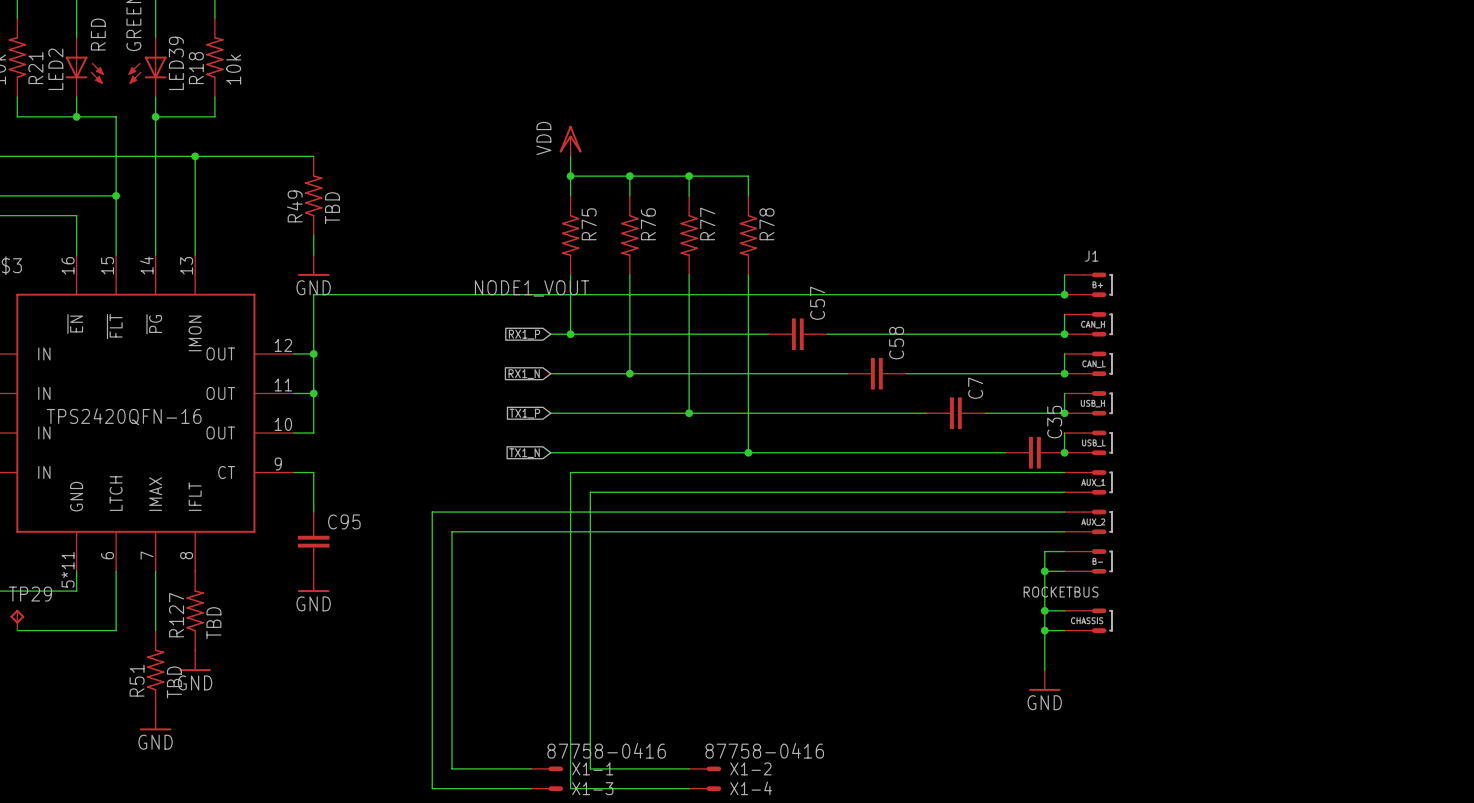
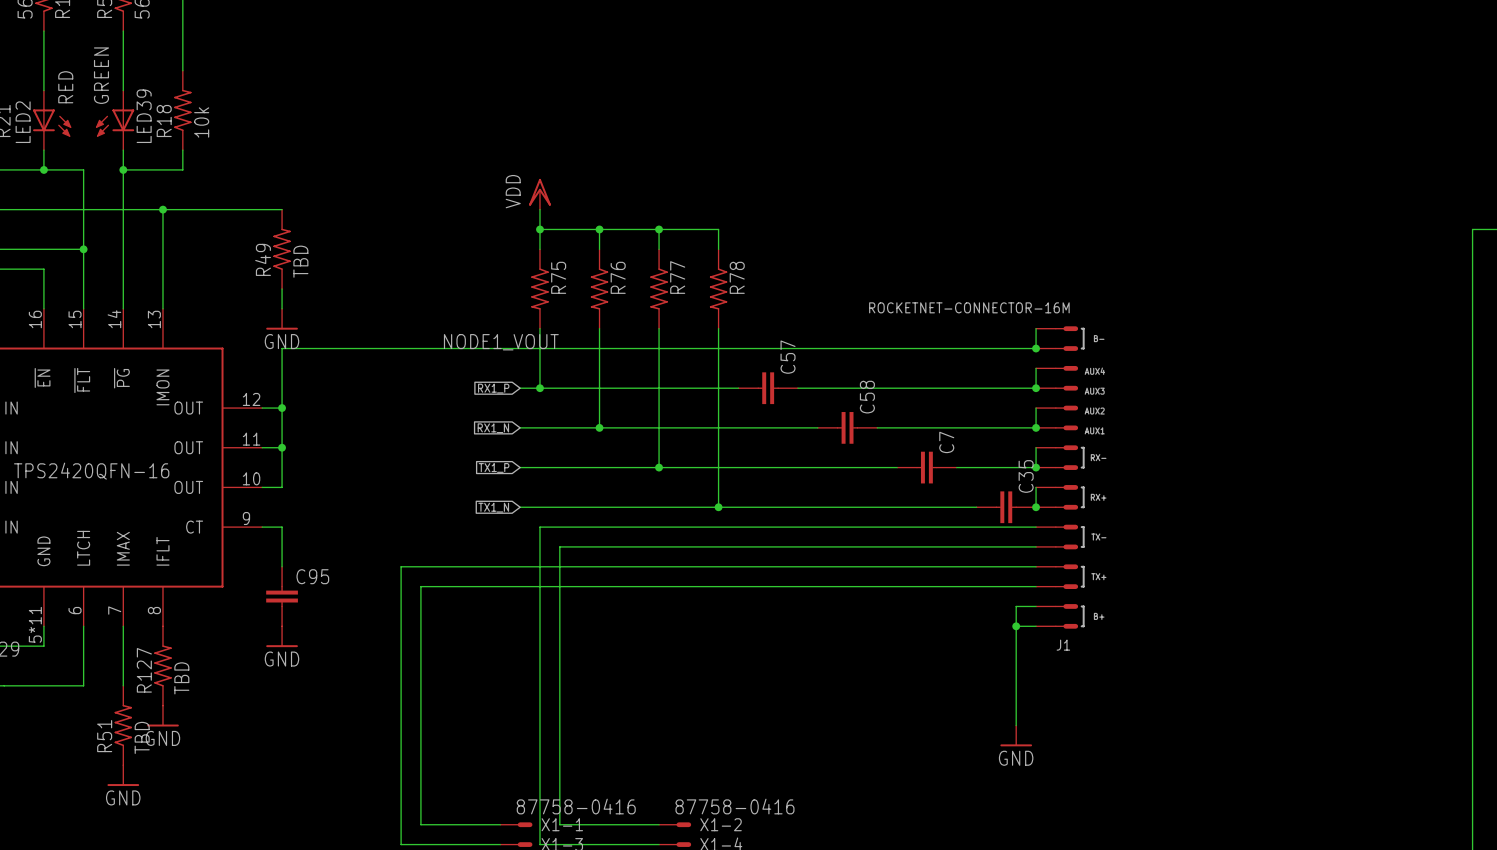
J1 name position: J1 (1091, 256) -> J1 (1063, 645)
J1 symbol: [1064, 272, 1113, 633] -> [1036, 326, 1085, 629]
J1 value: ROCKETBUS (1061, 592) -> ROCKETNET-CONNECTOR-16M (969, 307)
wire: (1044, 610) (1064, 610) -> none
junction: (1044, 610) -> none
wire: (1044, 630) (1064, 630) -> none
junction: (1044, 630) -> none

